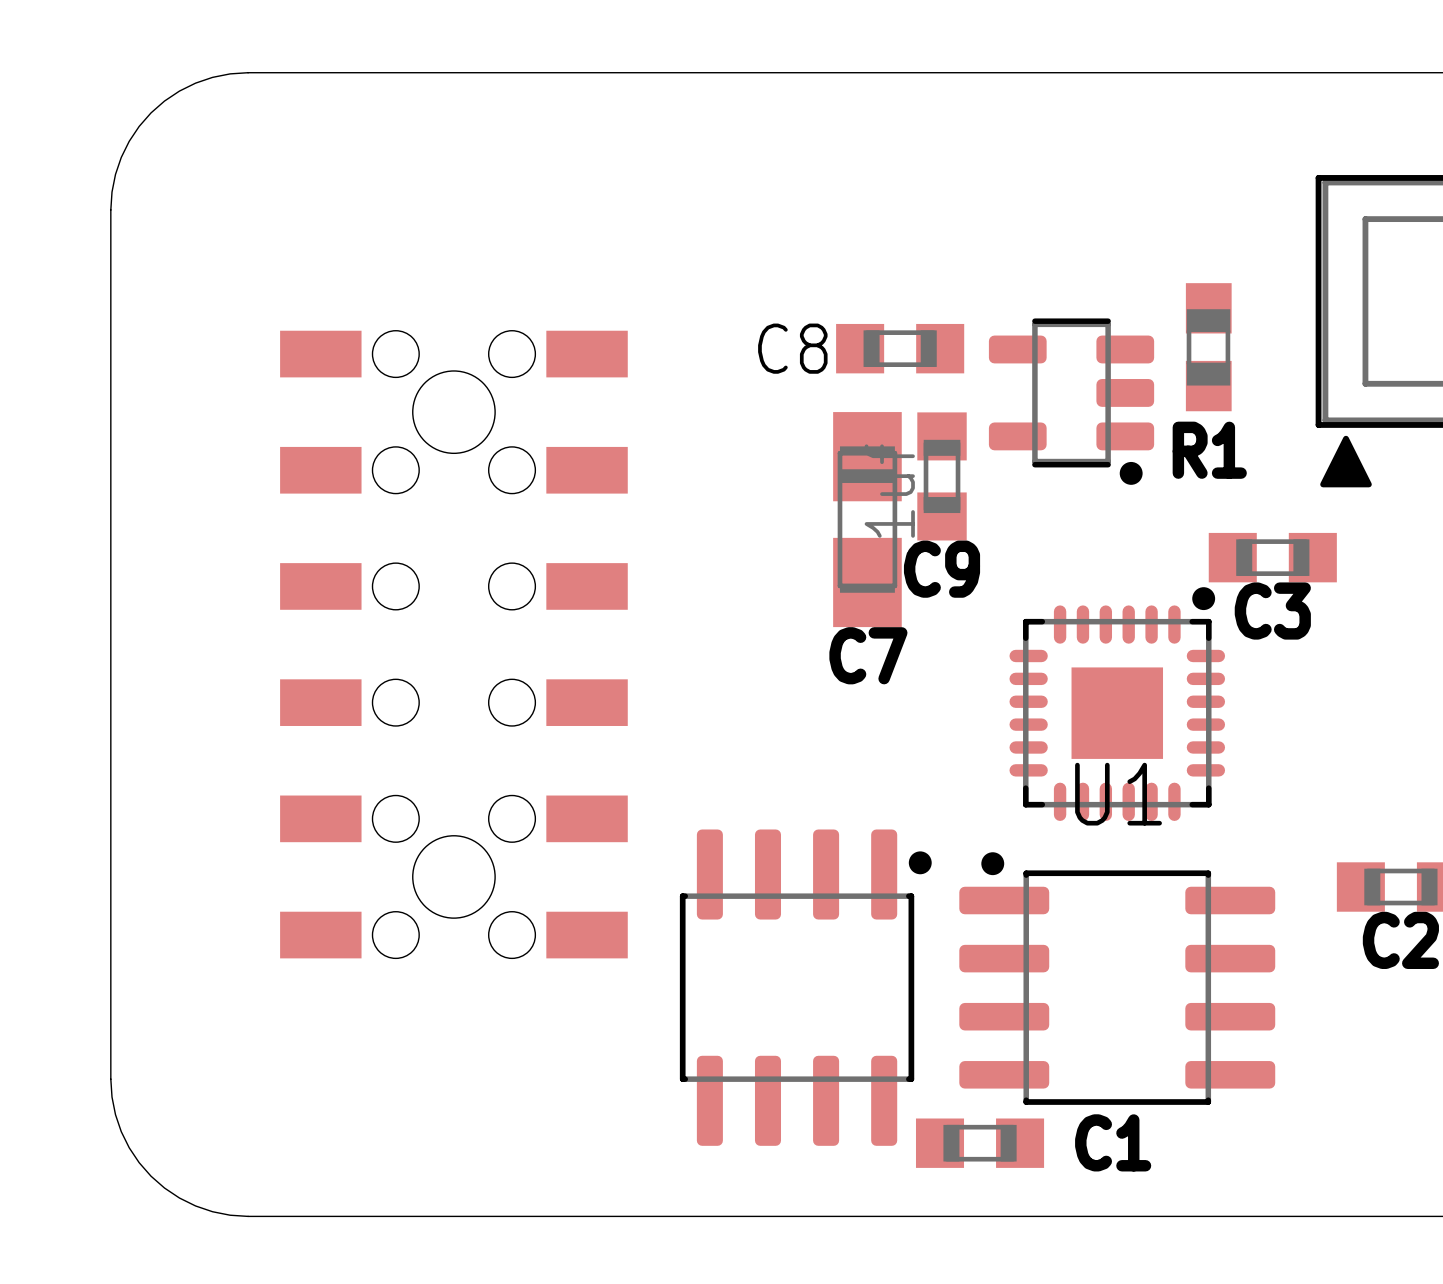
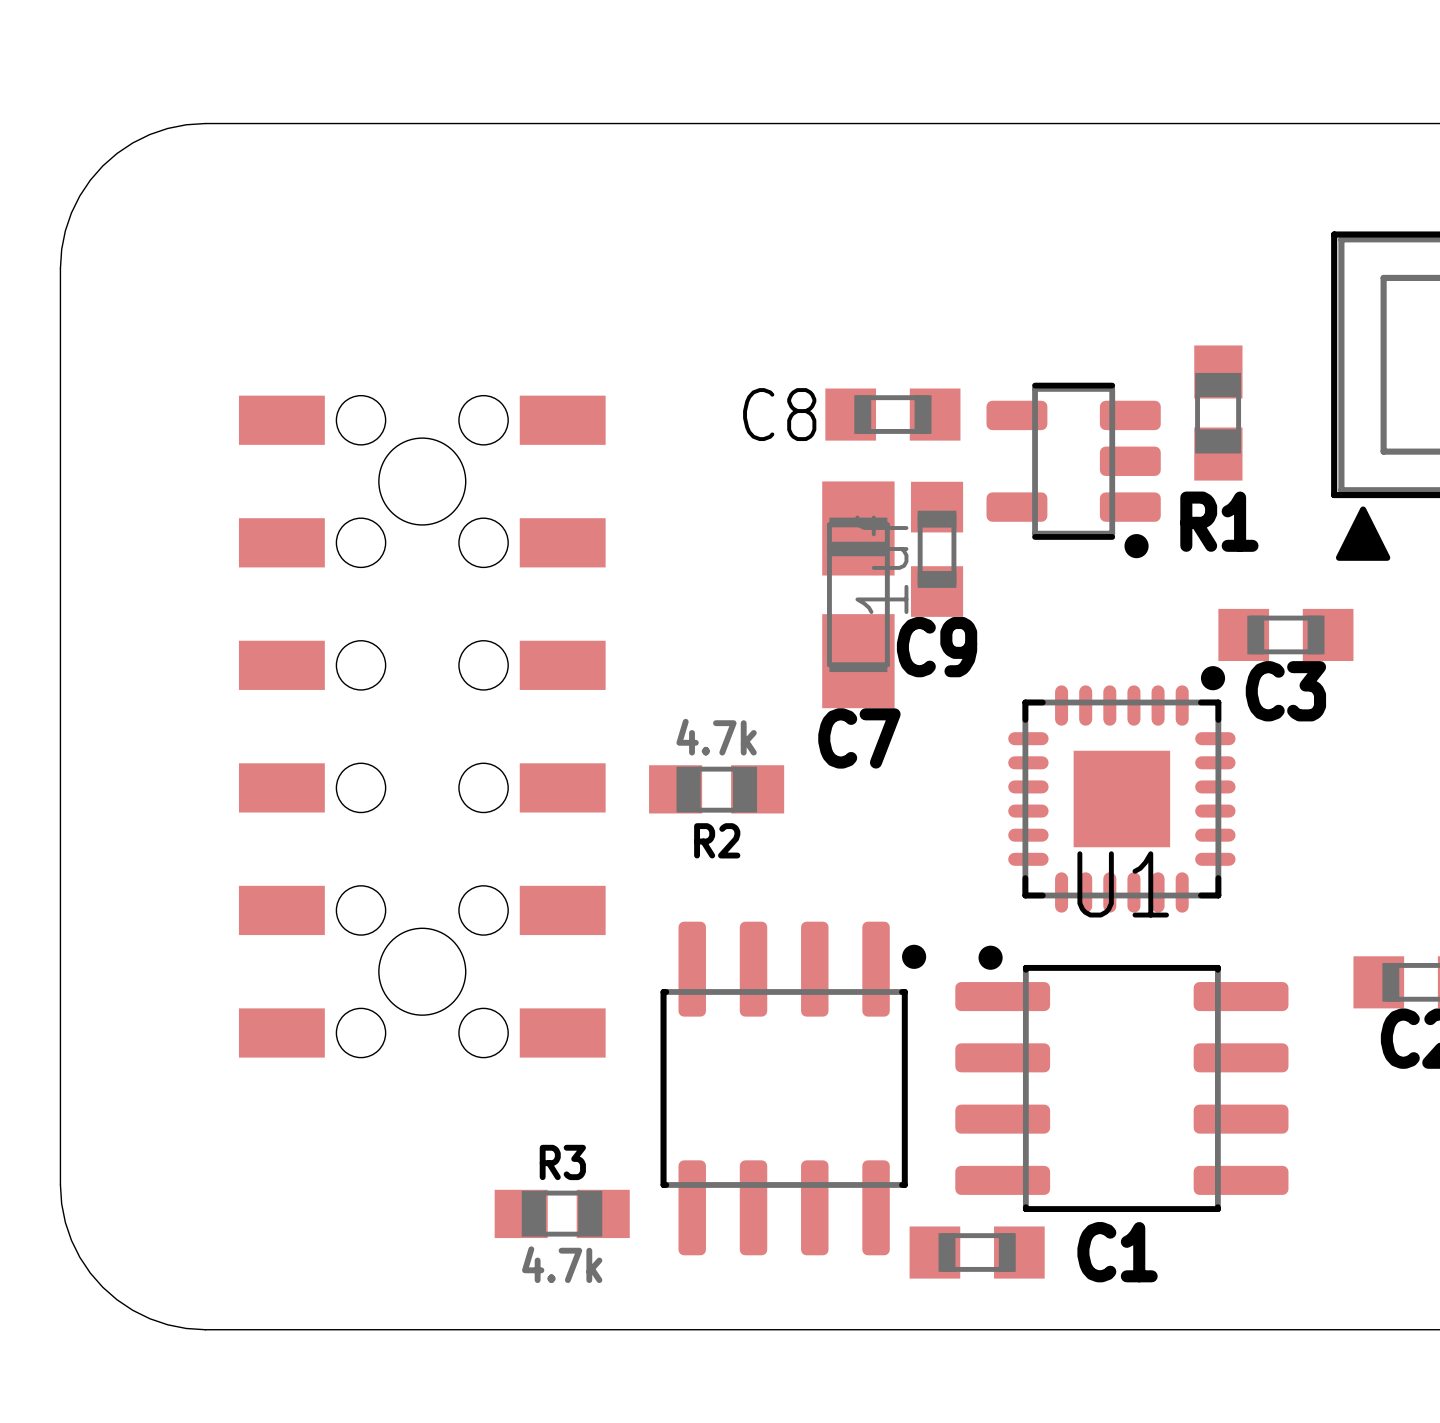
R2: none -> 4.7k (716, 789)
R3: none -> 4.7k (562, 1213)

